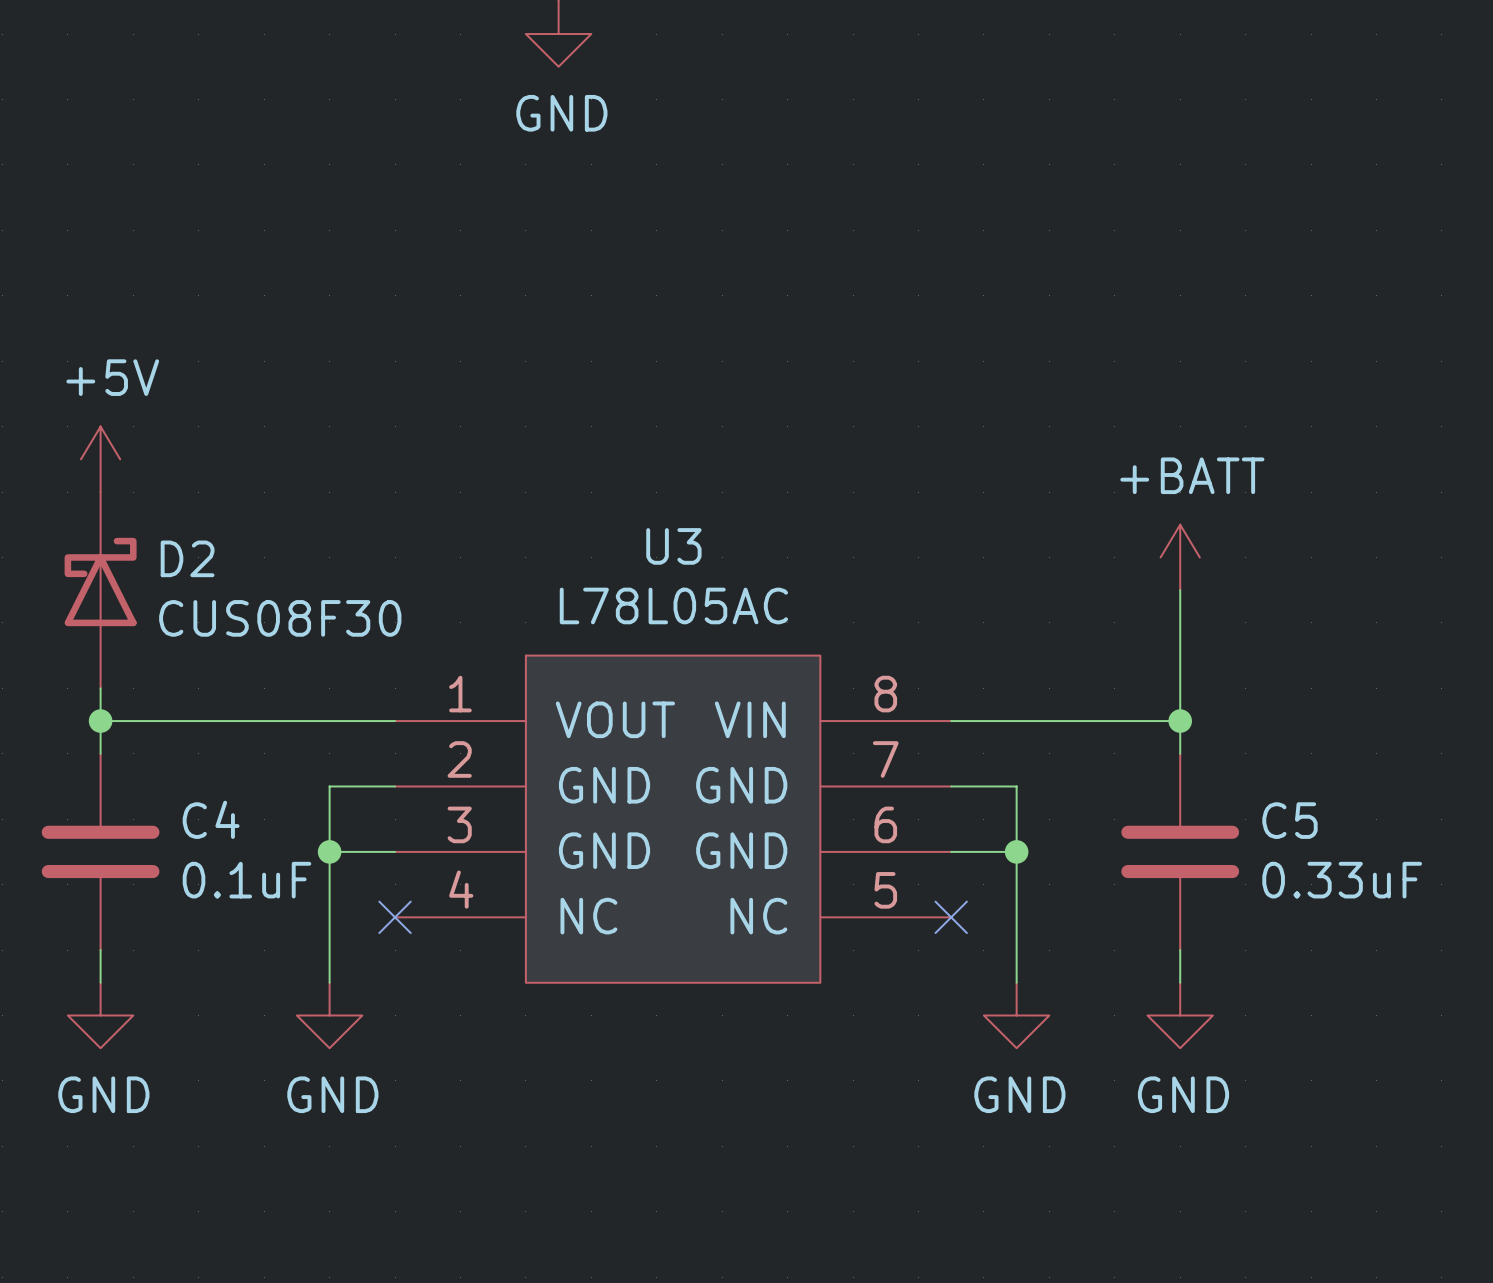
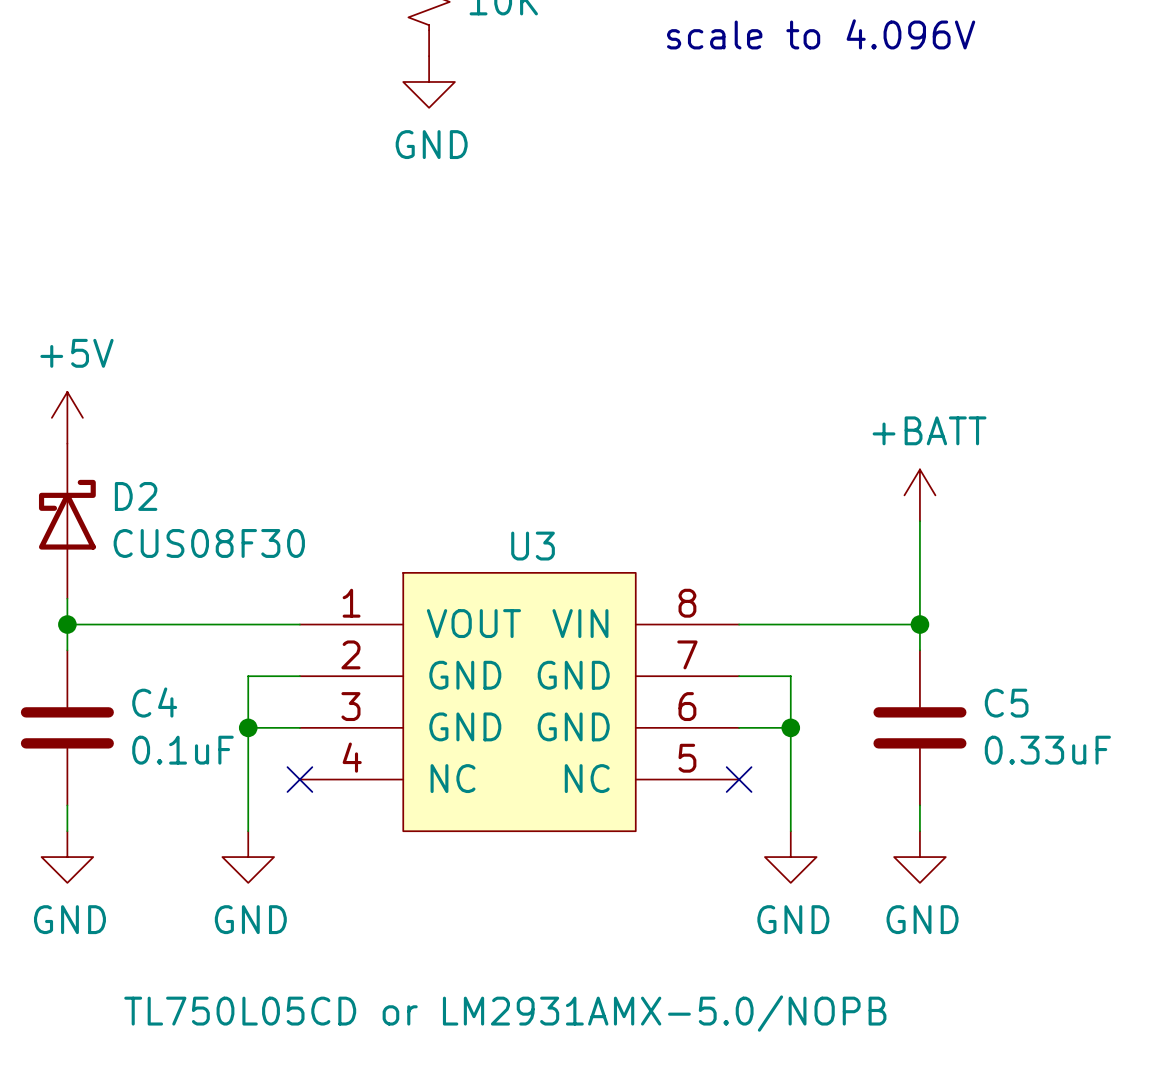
U3 name position: U3 (673, 546) -> U3 (533, 546)
U3 value: L78L05AC (673, 605) -> TL750L05CD or LM2931AMX-5.0/NOPB (505, 1013)

